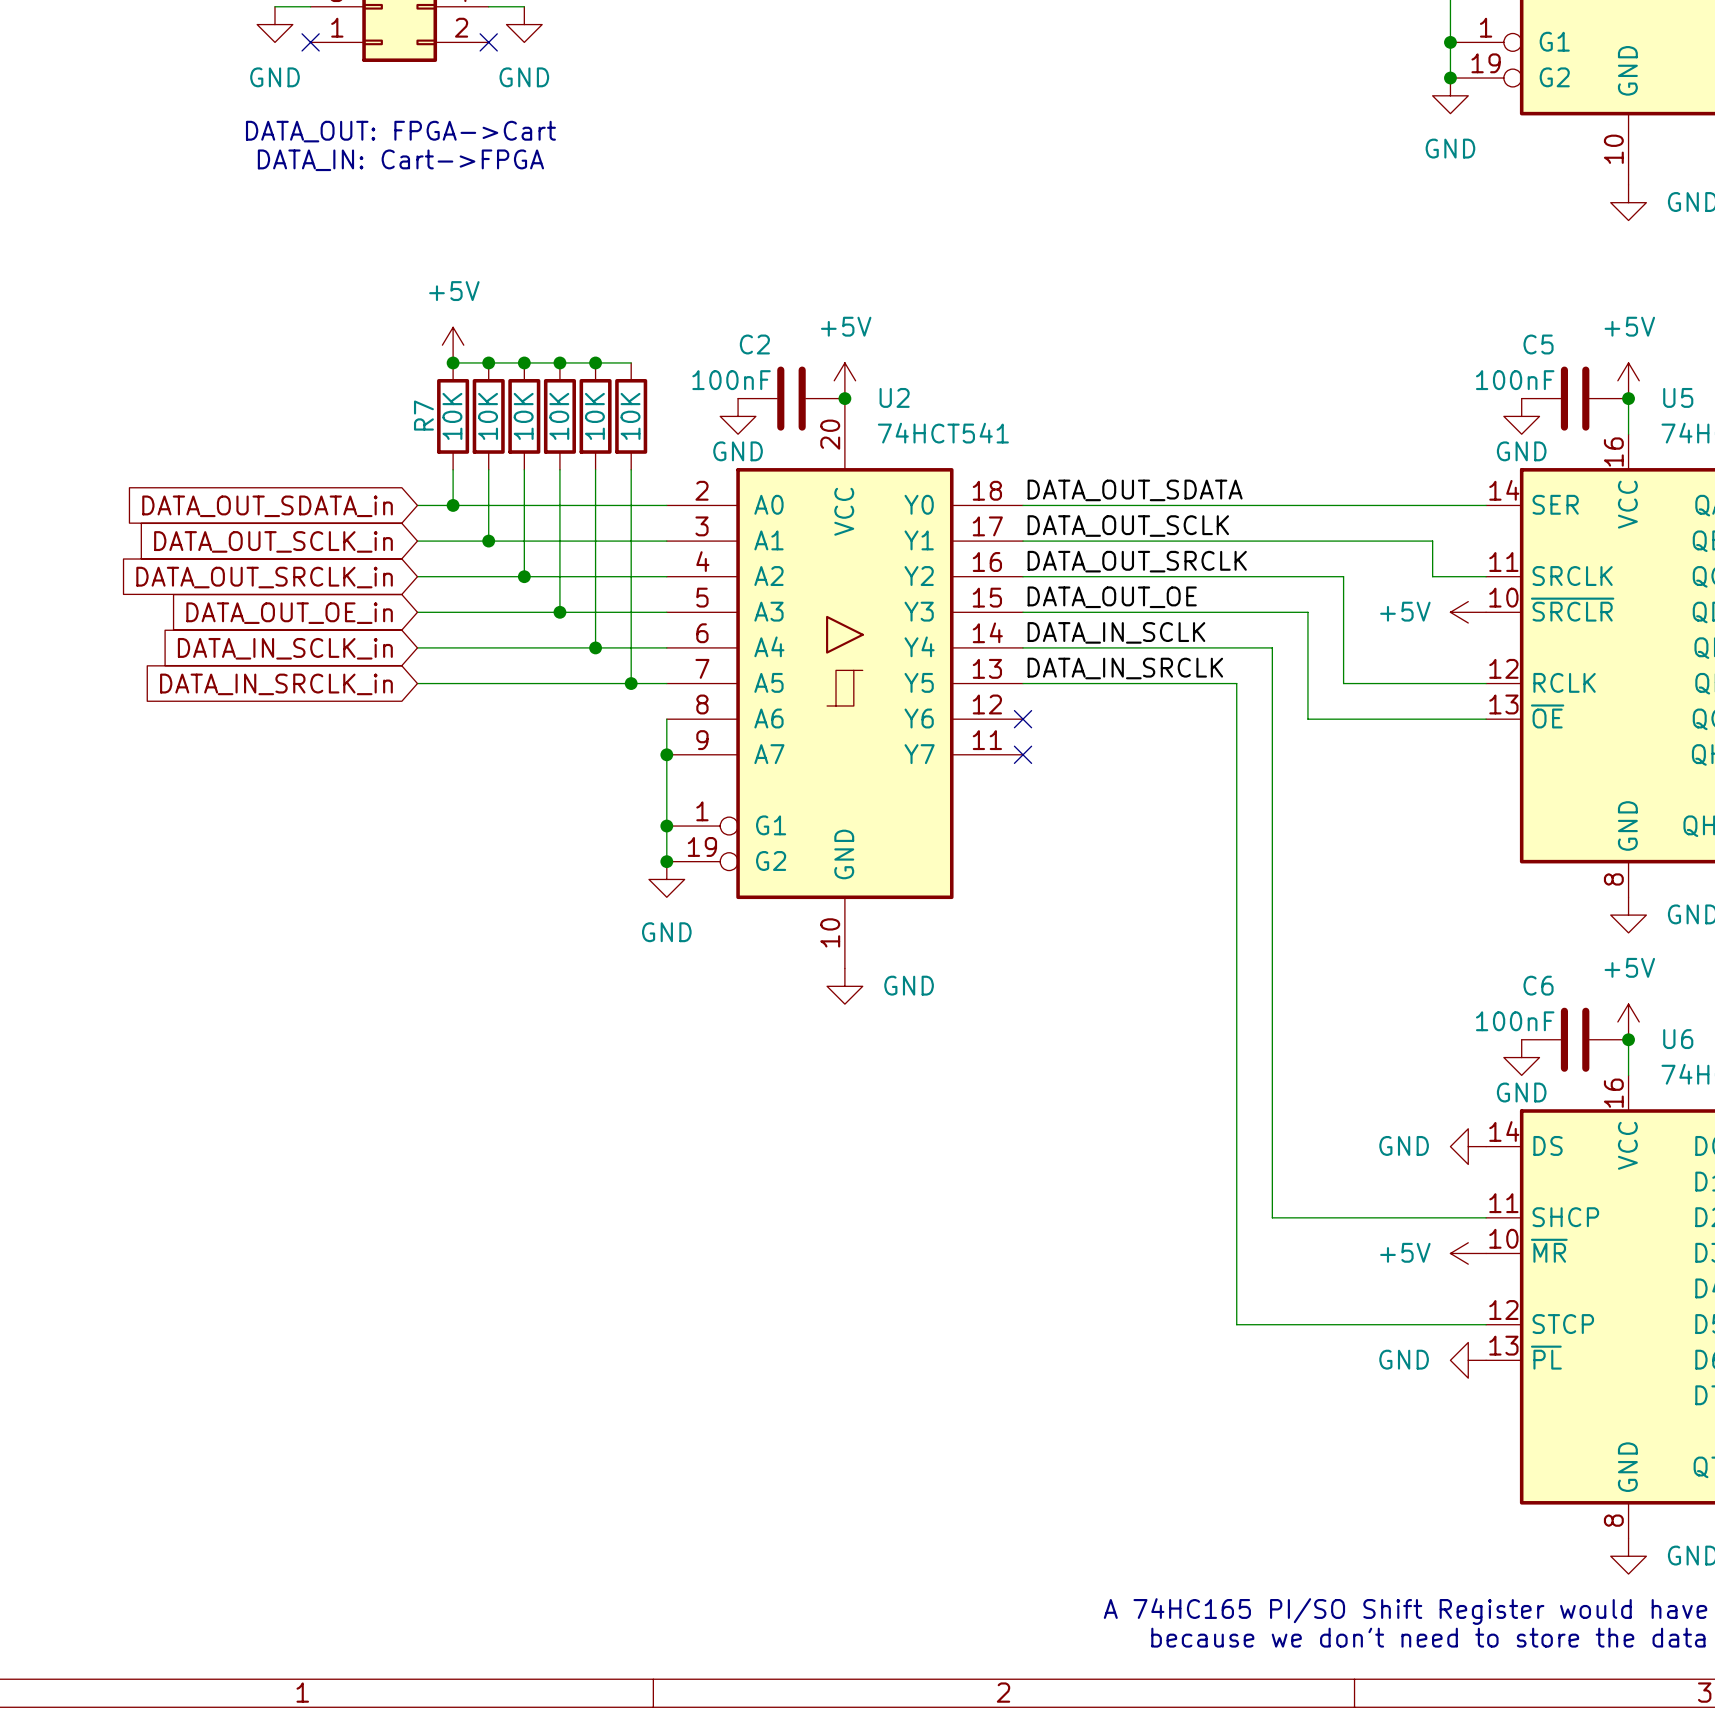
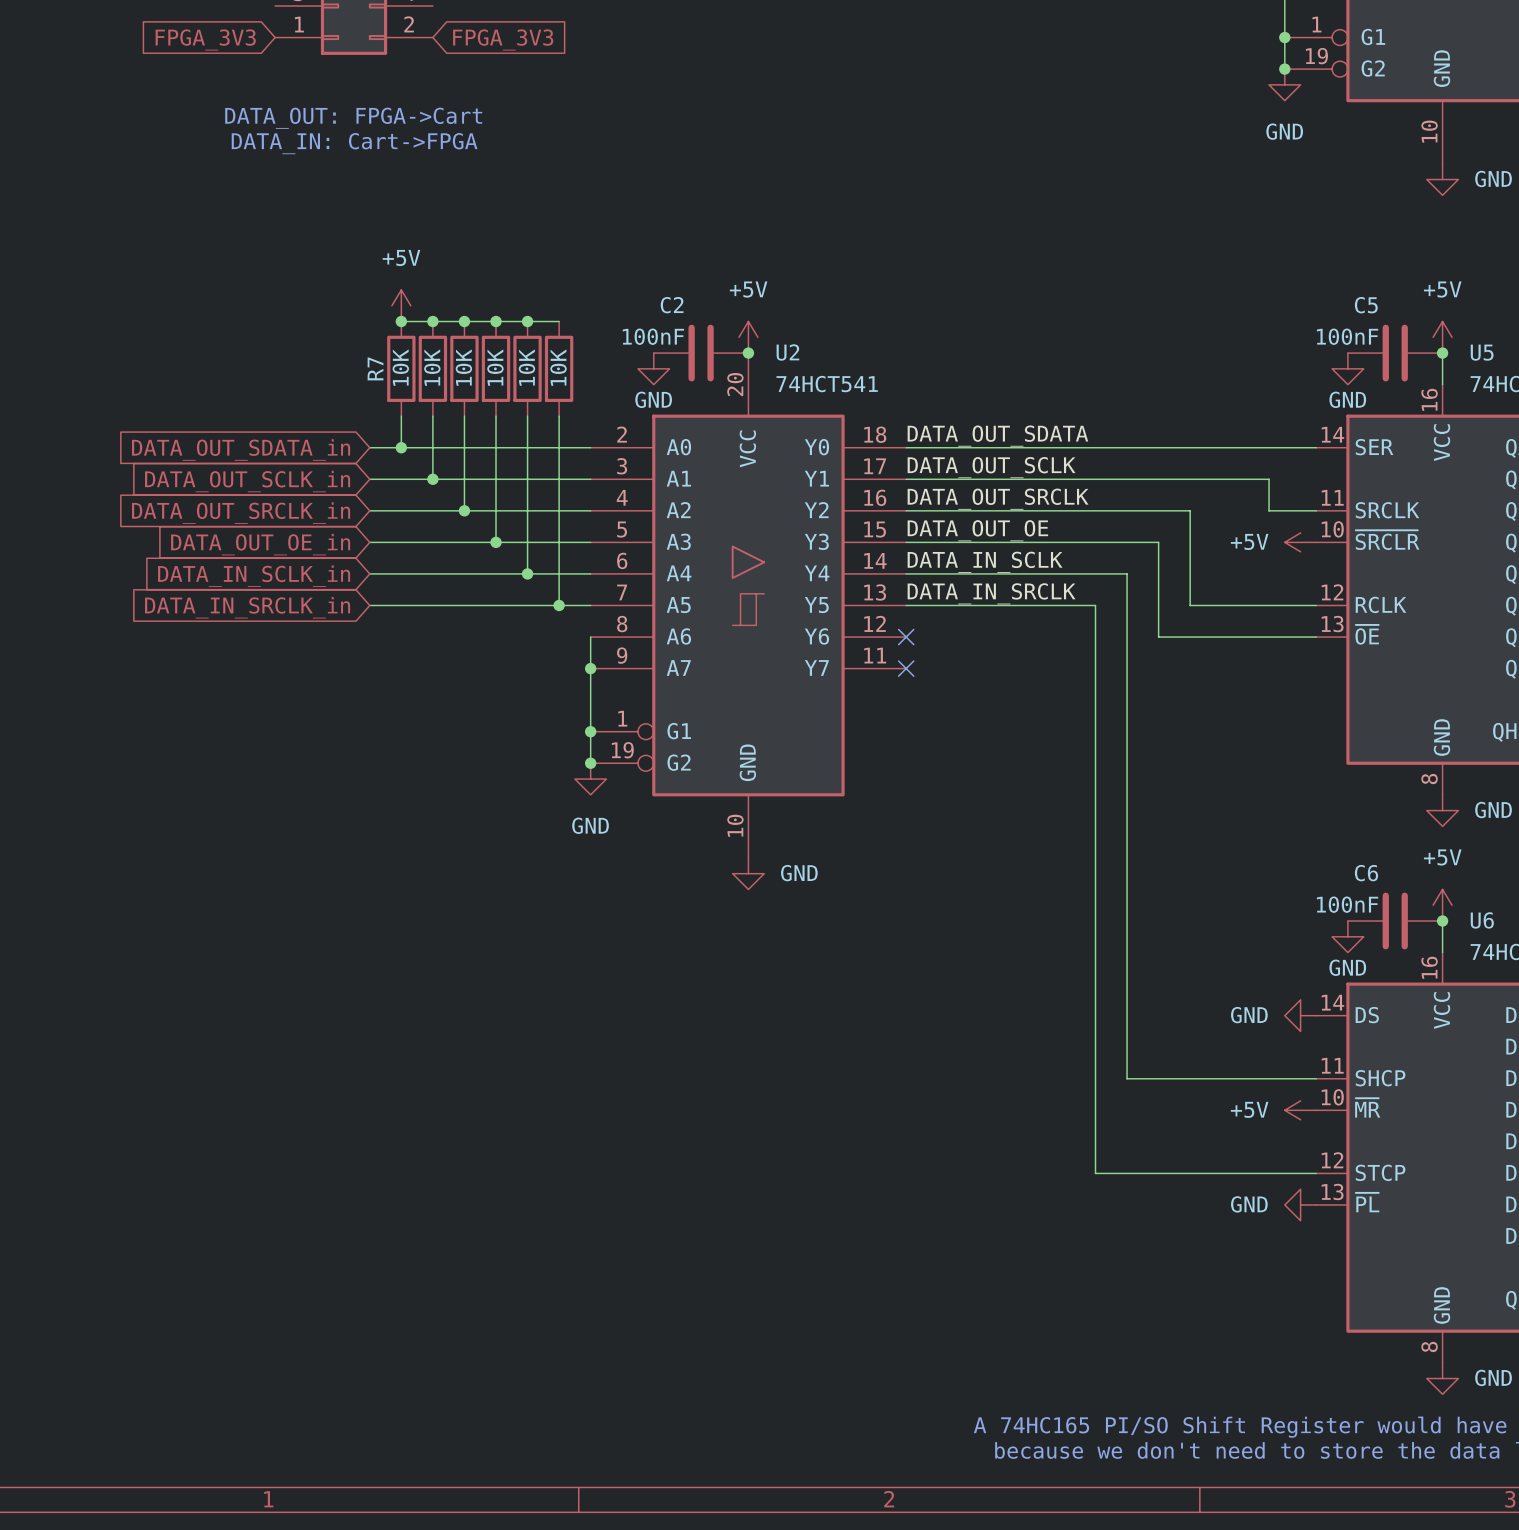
wire: (274, 6) (310, 6) -> none
wire: (488, 6) (524, 6) -> none
power symbol: GND (274, 24) -> none
power symbol: GND (524, 24) -> none
no-connect mark: (310, 42) -> none
no-connect mark: (488, 42) -> none
global label: none -> FPGA_3V3 (205, 39)
global label: none -> FPGA_3V3 (503, 39)

